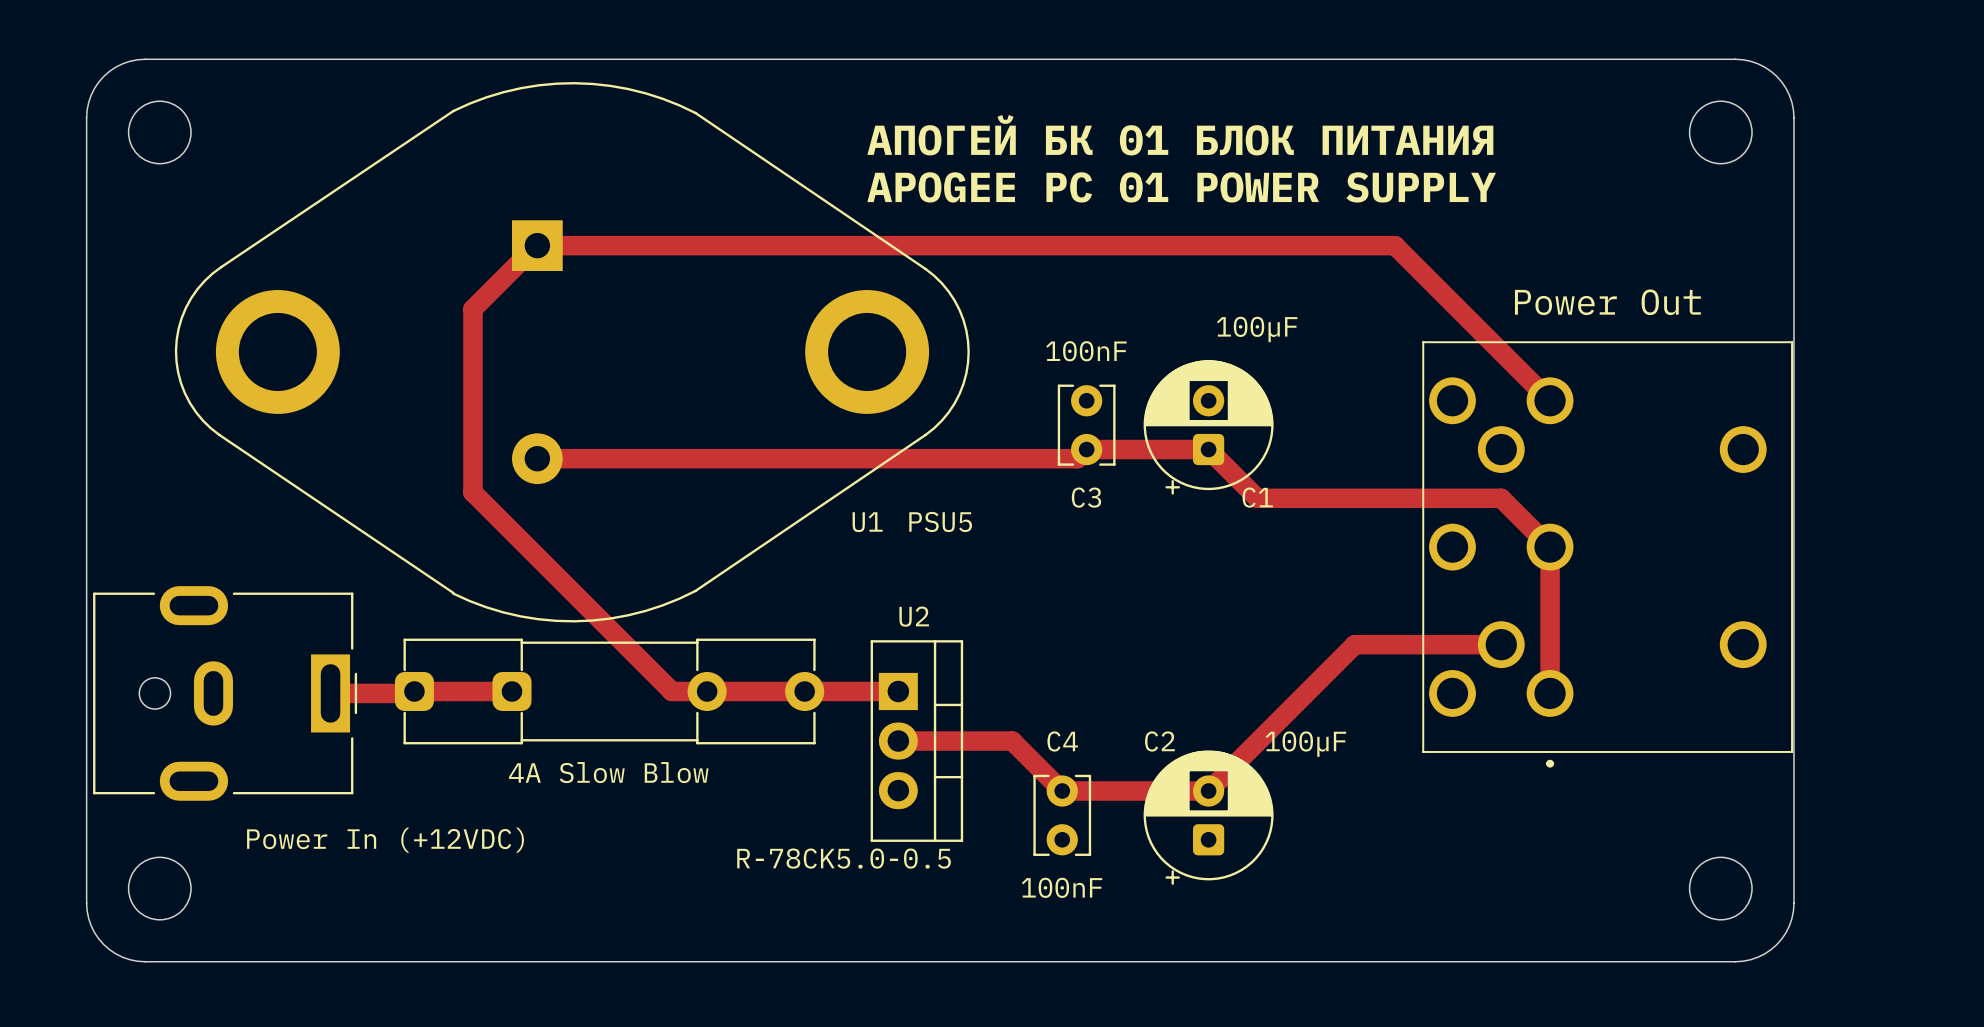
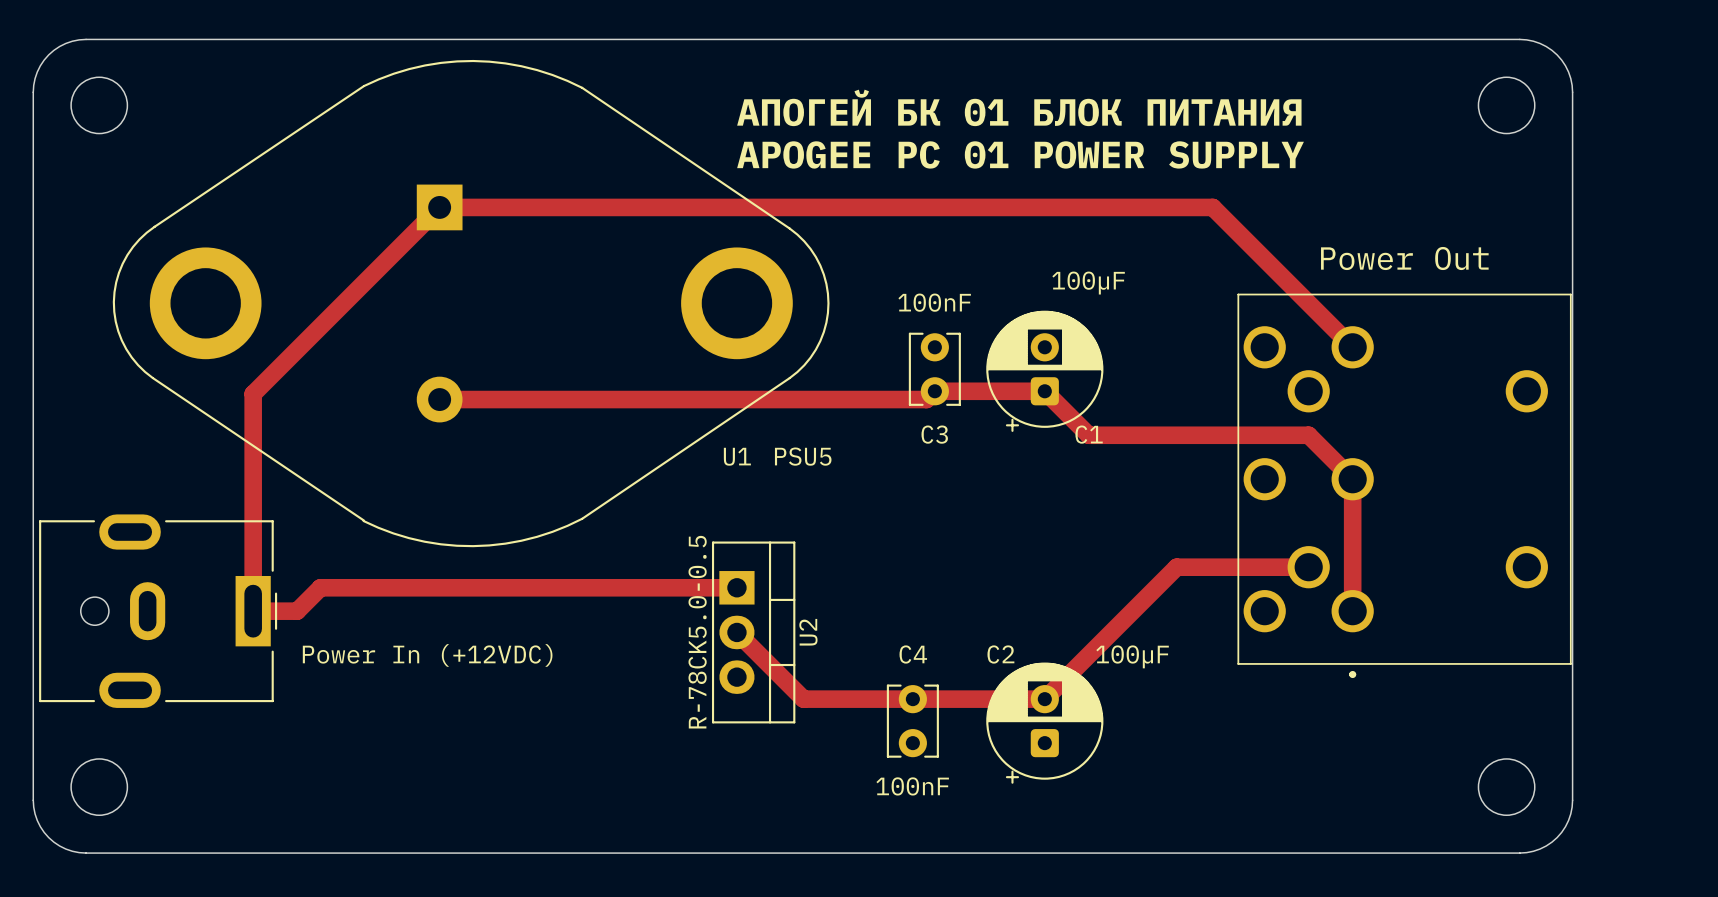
track: (537, 245) (472, 309) (472, 492) (672, 691) (898, 691) -> (439, 207) (253, 393) (253, 611)
U2 name rotation: 0° (914, 616) -> 90° counterclockwise (808, 632)
U2 name position: U2 (914, 616) -> U2 (808, 632)
track: (512, 691) (379, 693) -> (736, 587) (320, 587) (297, 611)
part: (609, 691) -> none
track: (898, 741) (1012, 741) (1062, 791) -> (736, 632) (803, 699) (912, 699)
U2 position: (916, 741) -> (753, 632)
text: 4A Slow Blow (608, 772) -> none
part value position: Power In (+12VDC) (385, 840) -> Power In (+12VDC) (427, 655)
U2 value rotation: 0° (844, 858) -> 90° counterclockwise (697, 632)

